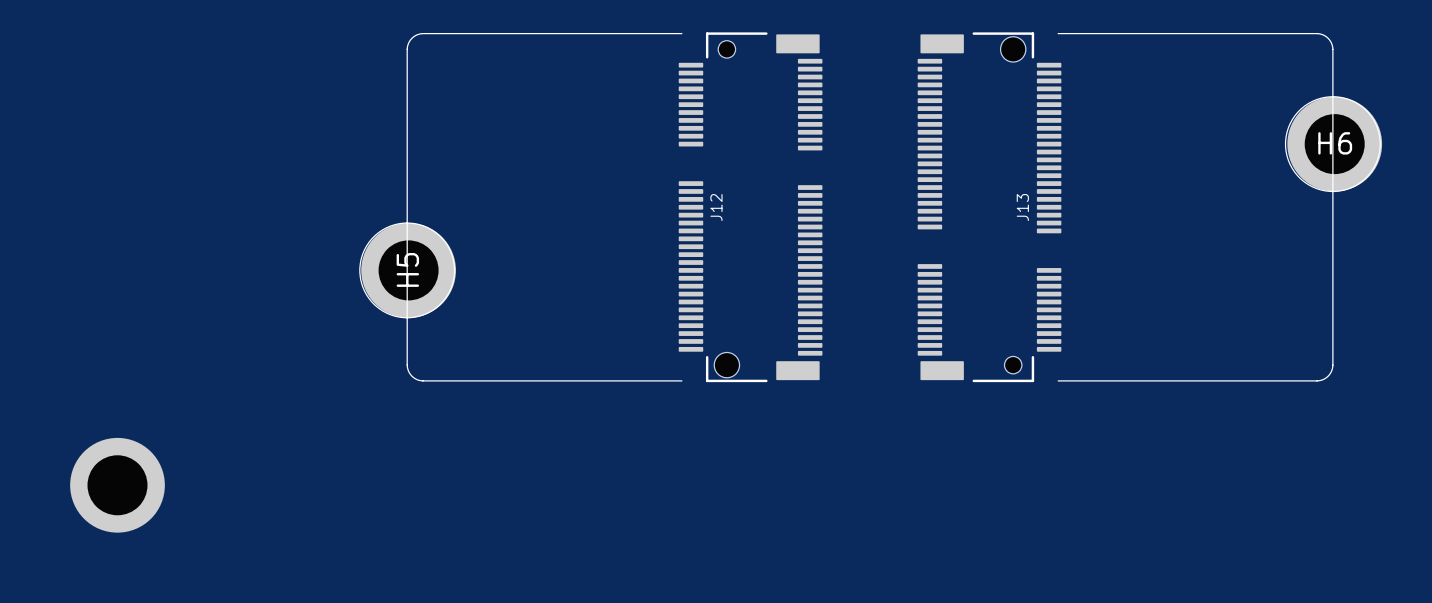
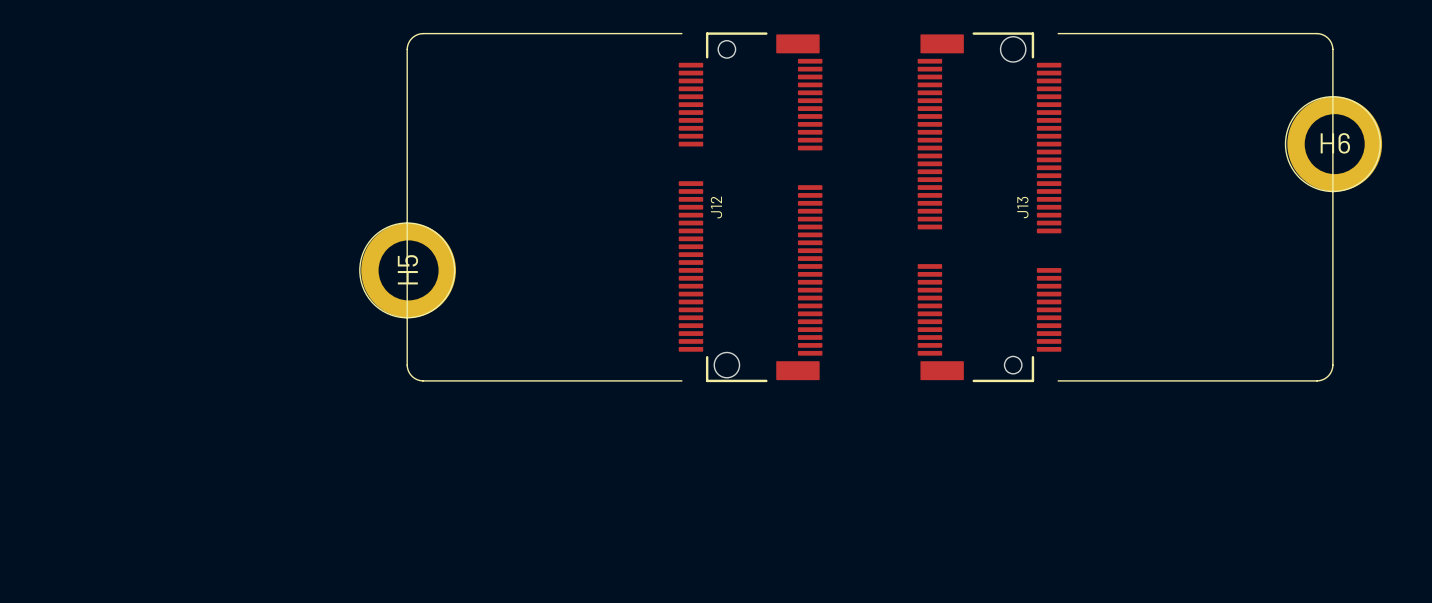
part: (117, 485) -> none

